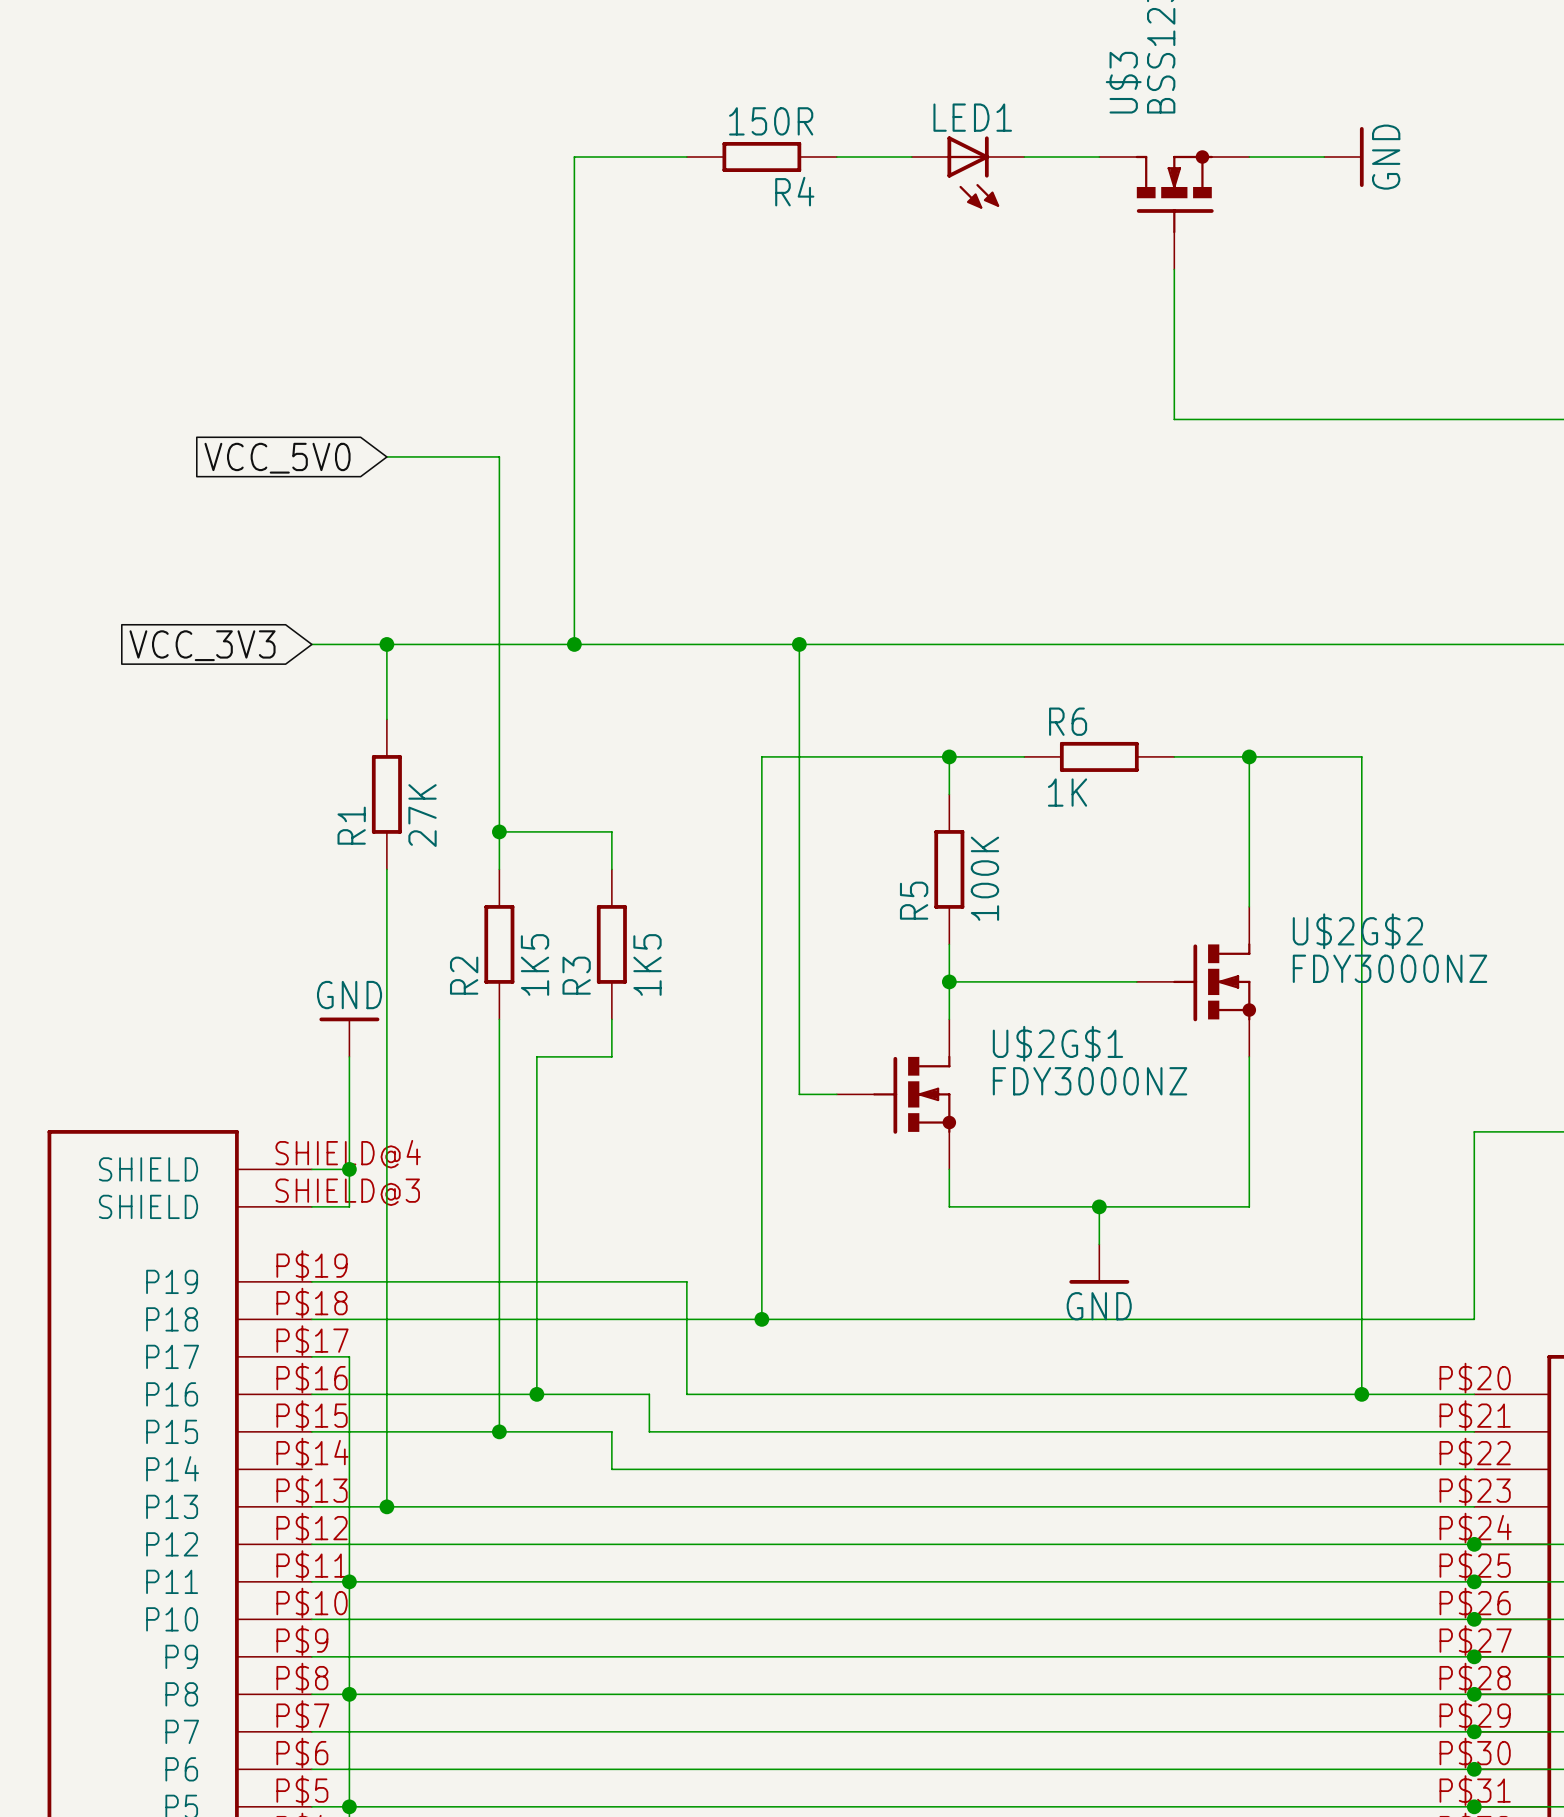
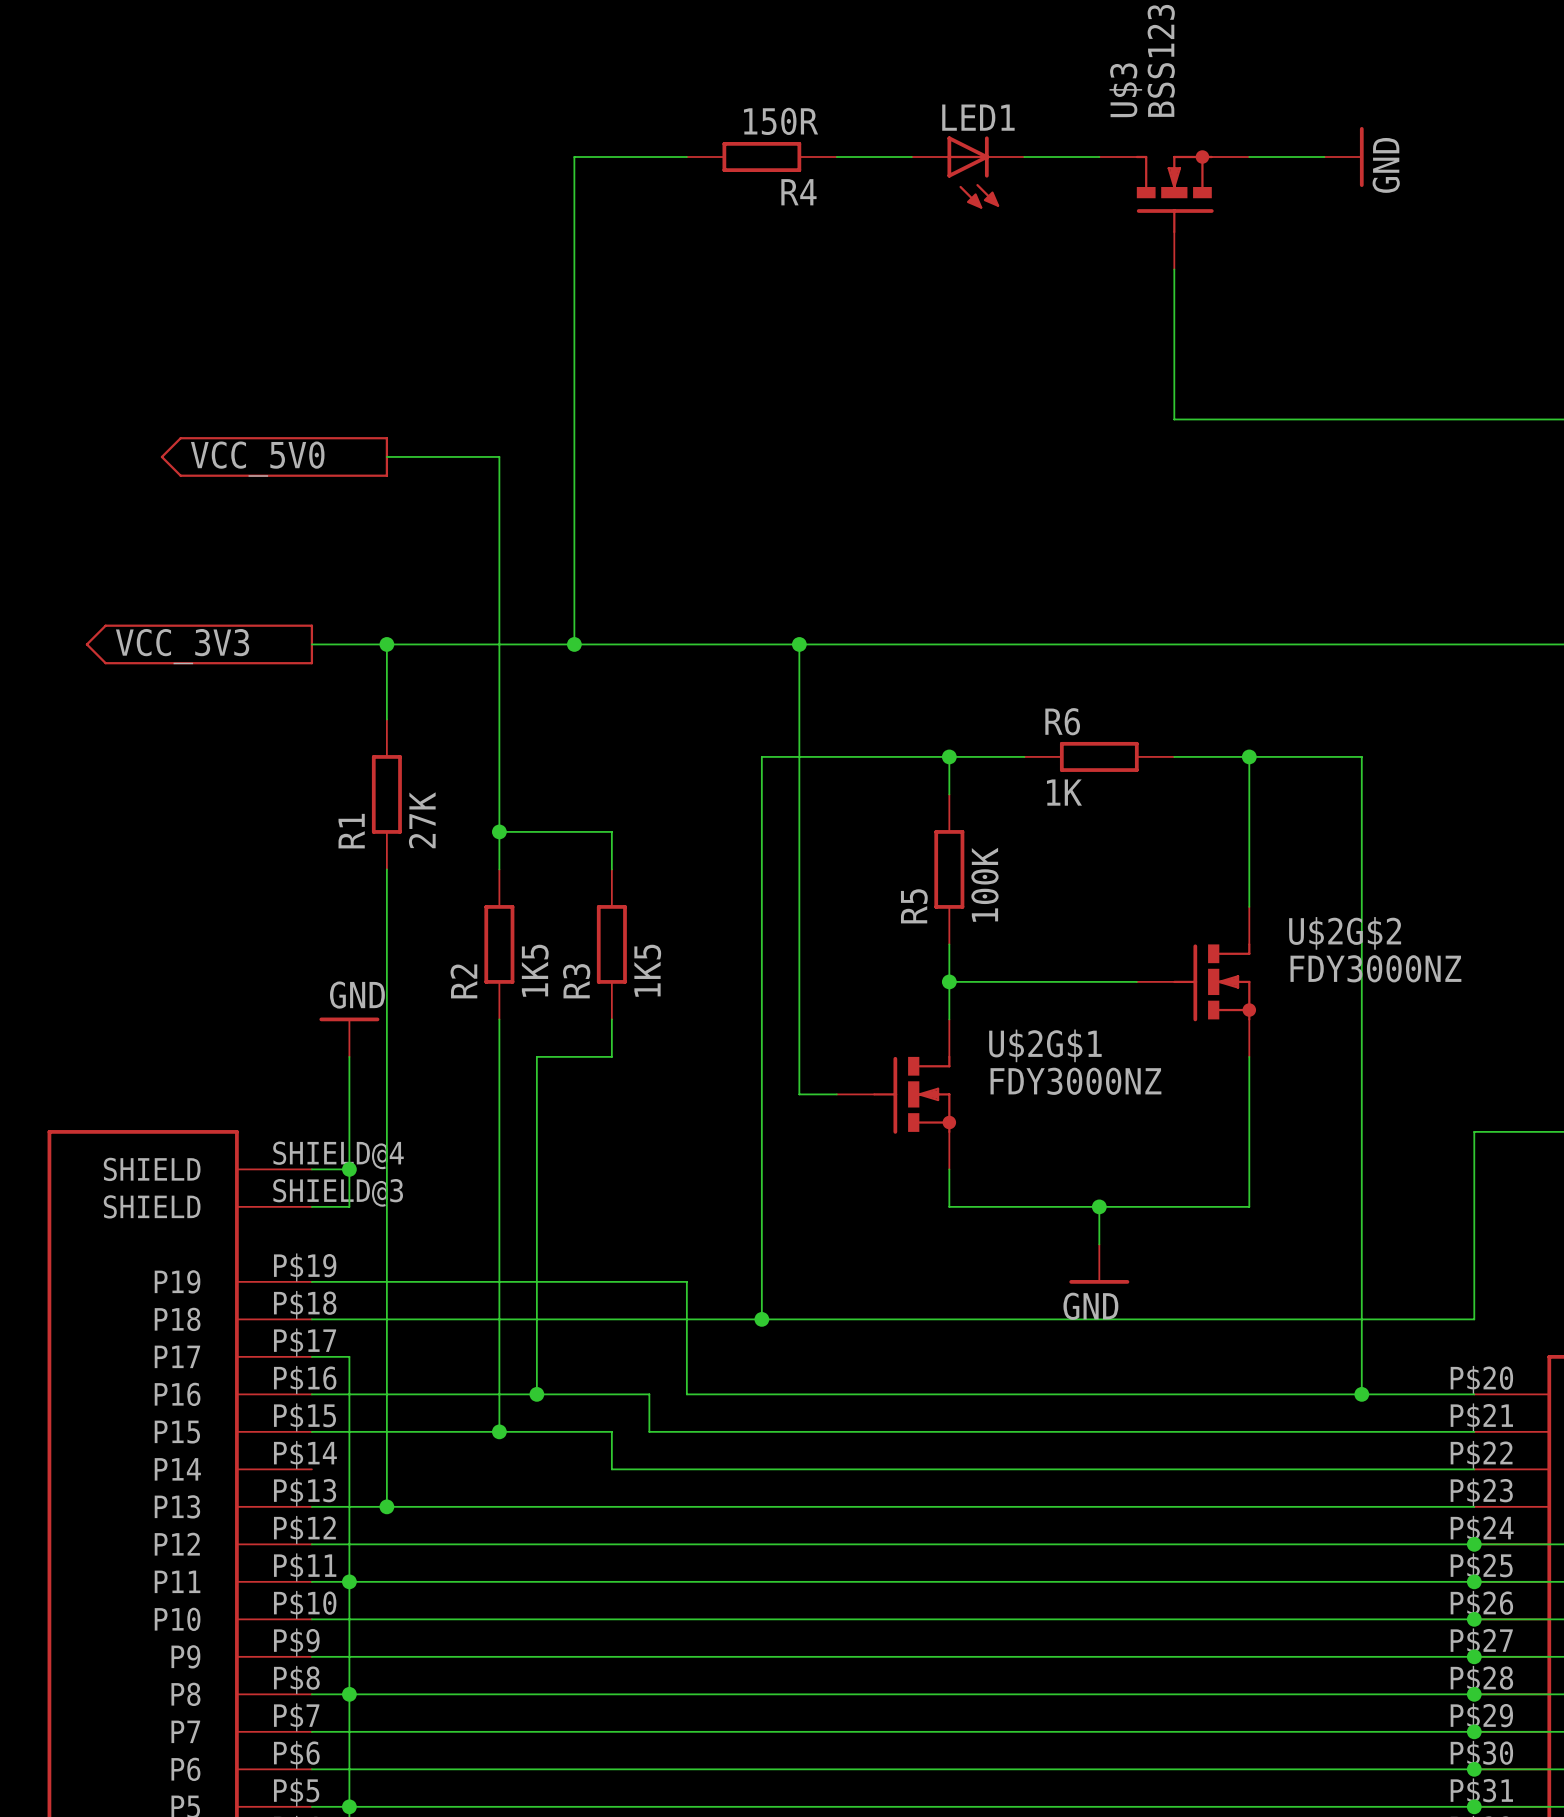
part: none -> VCC_5V0 (274, 456)
global label: VCC_5V0 (277, 458) -> none
part: none -> VCC_3V3 (199, 644)
global label: VCC_3V3 (202, 645) -> none

